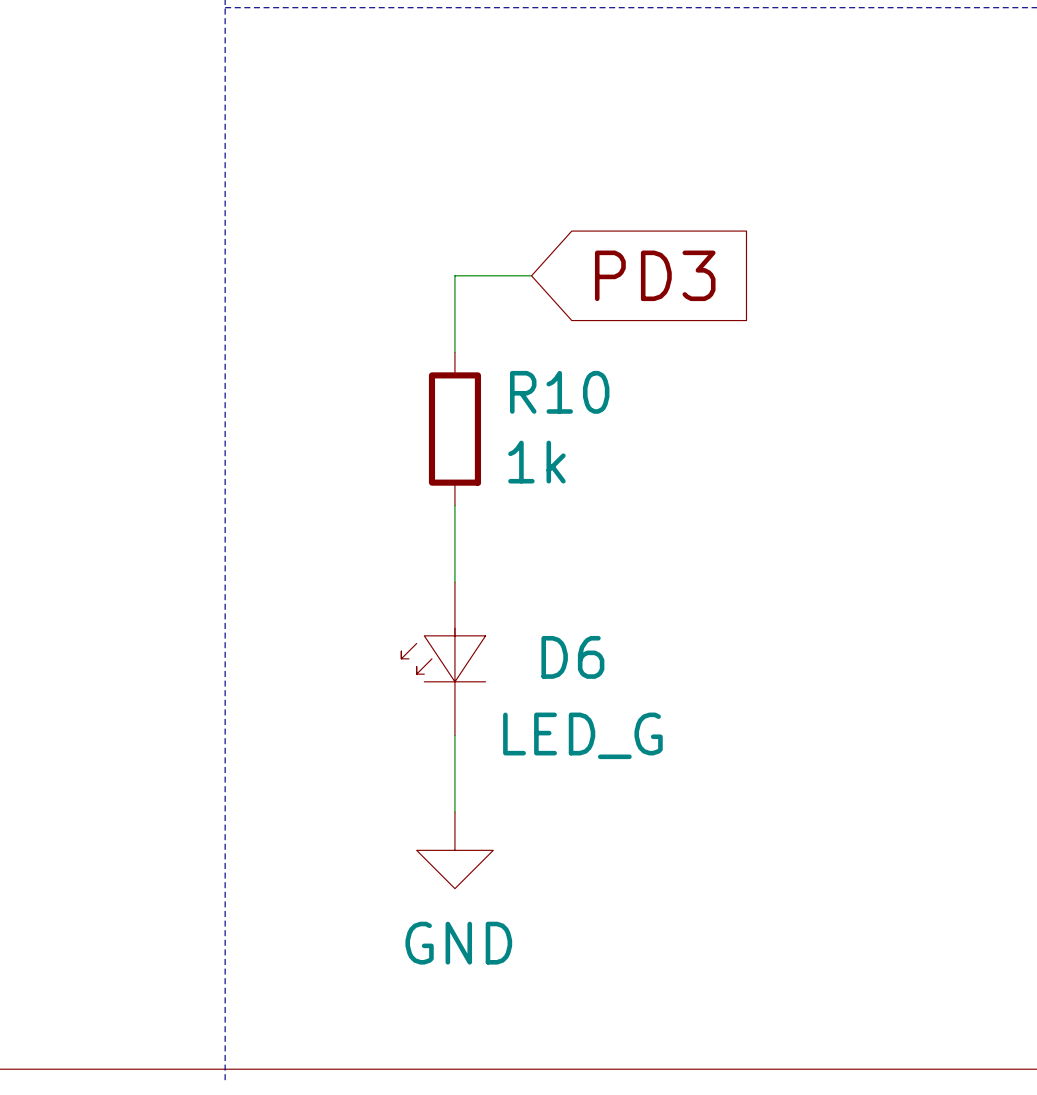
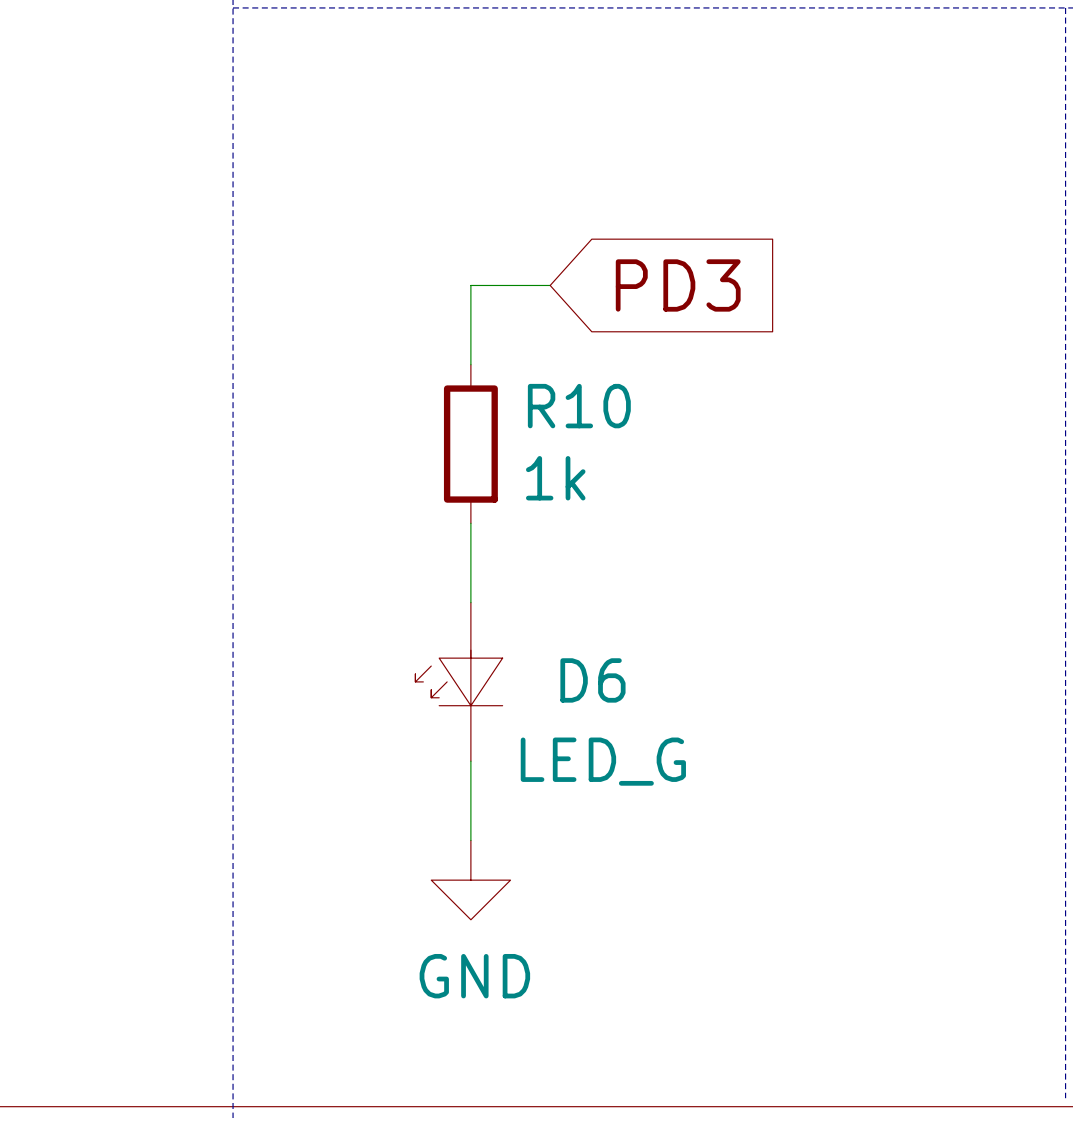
line: none -> (1065, 7) (1065, 1098)

